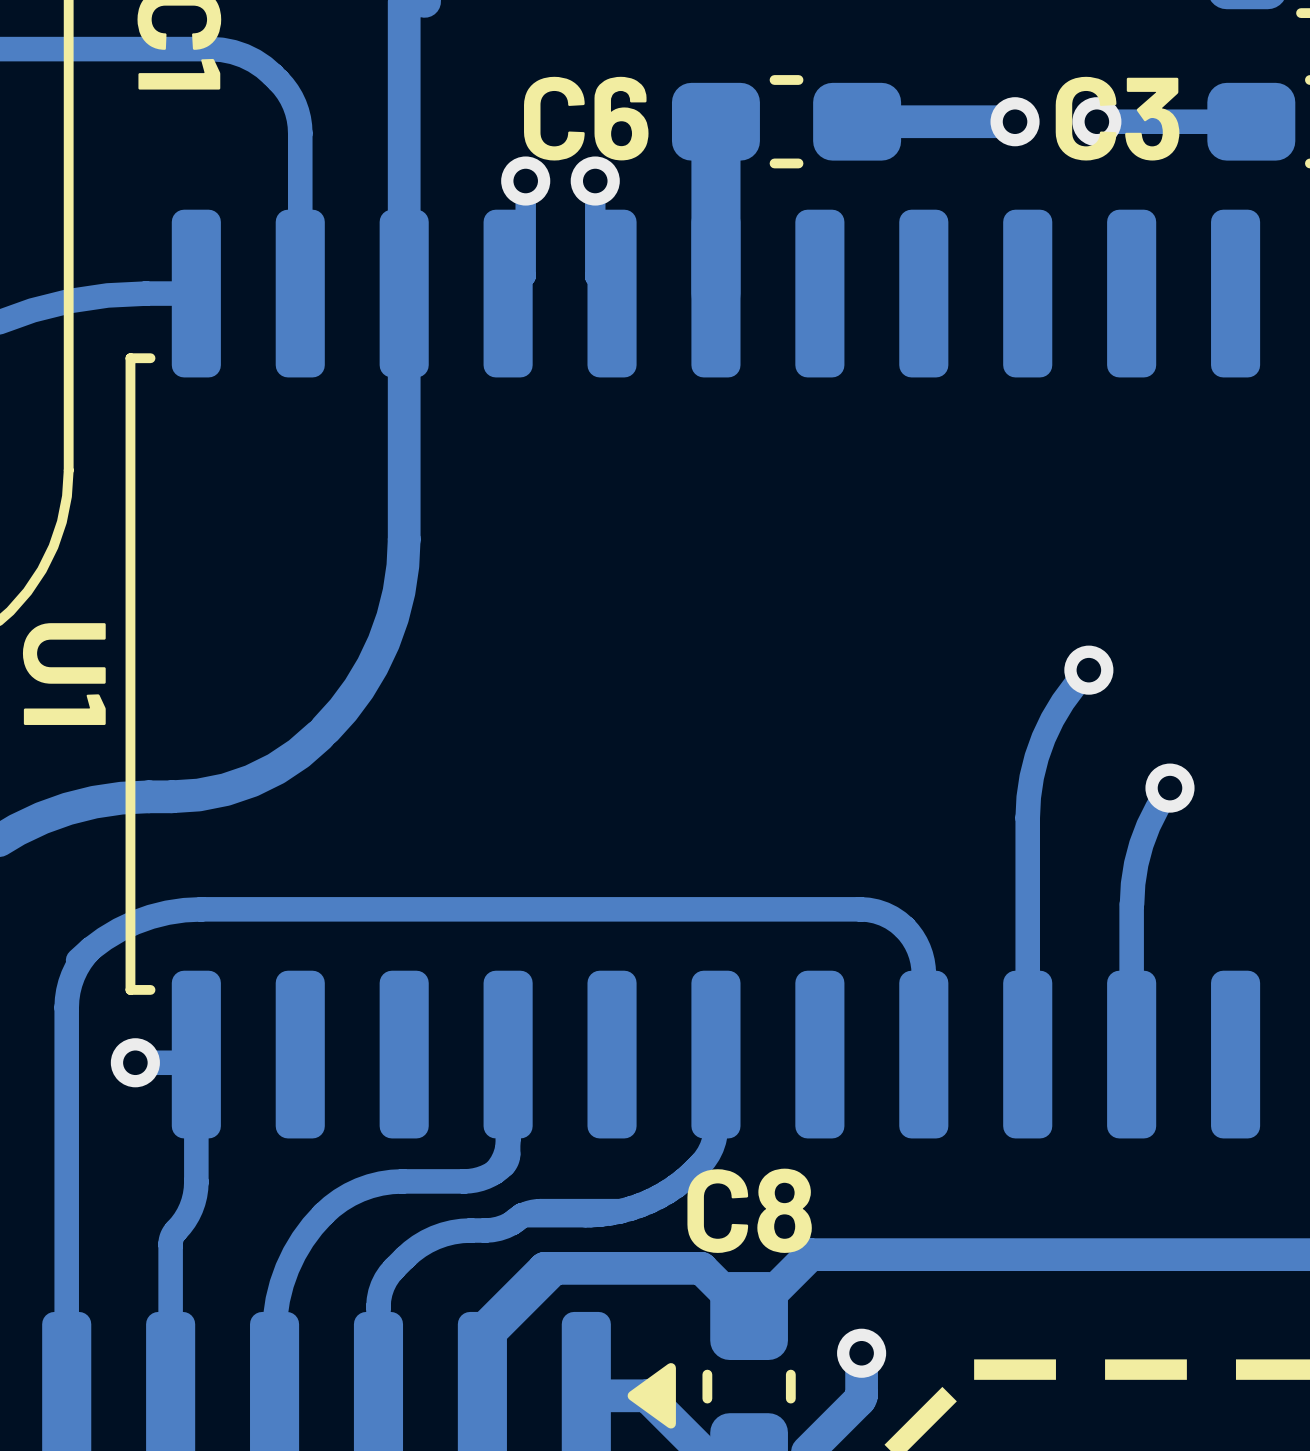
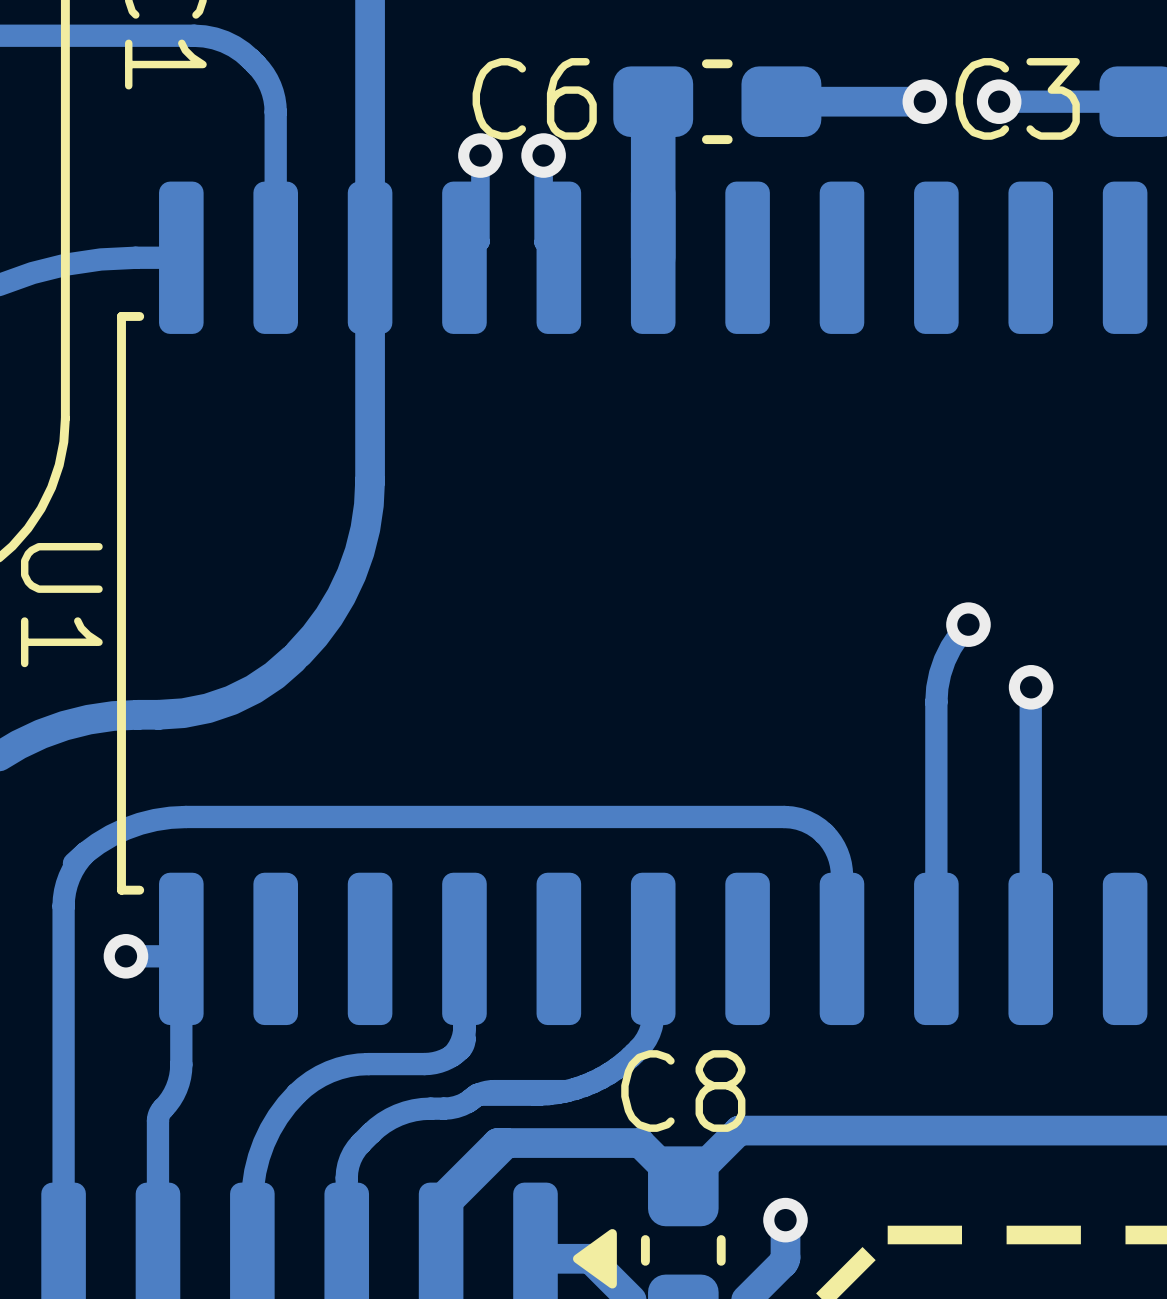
track: (1088, 670) (1062, 701) (1043, 737) (1031, 777) (1027, 817) -> (968, 624) (951, 647) (940, 673) (936, 702) (936, 733)
via position: (1088, 670) -> (968, 624)
via position: (1169, 788) -> (1031, 687)
track: (1168, 790) (1157, 807) (1141, 844) (1136, 863) (1132, 904) -> (1030, 687) (1030, 813)

